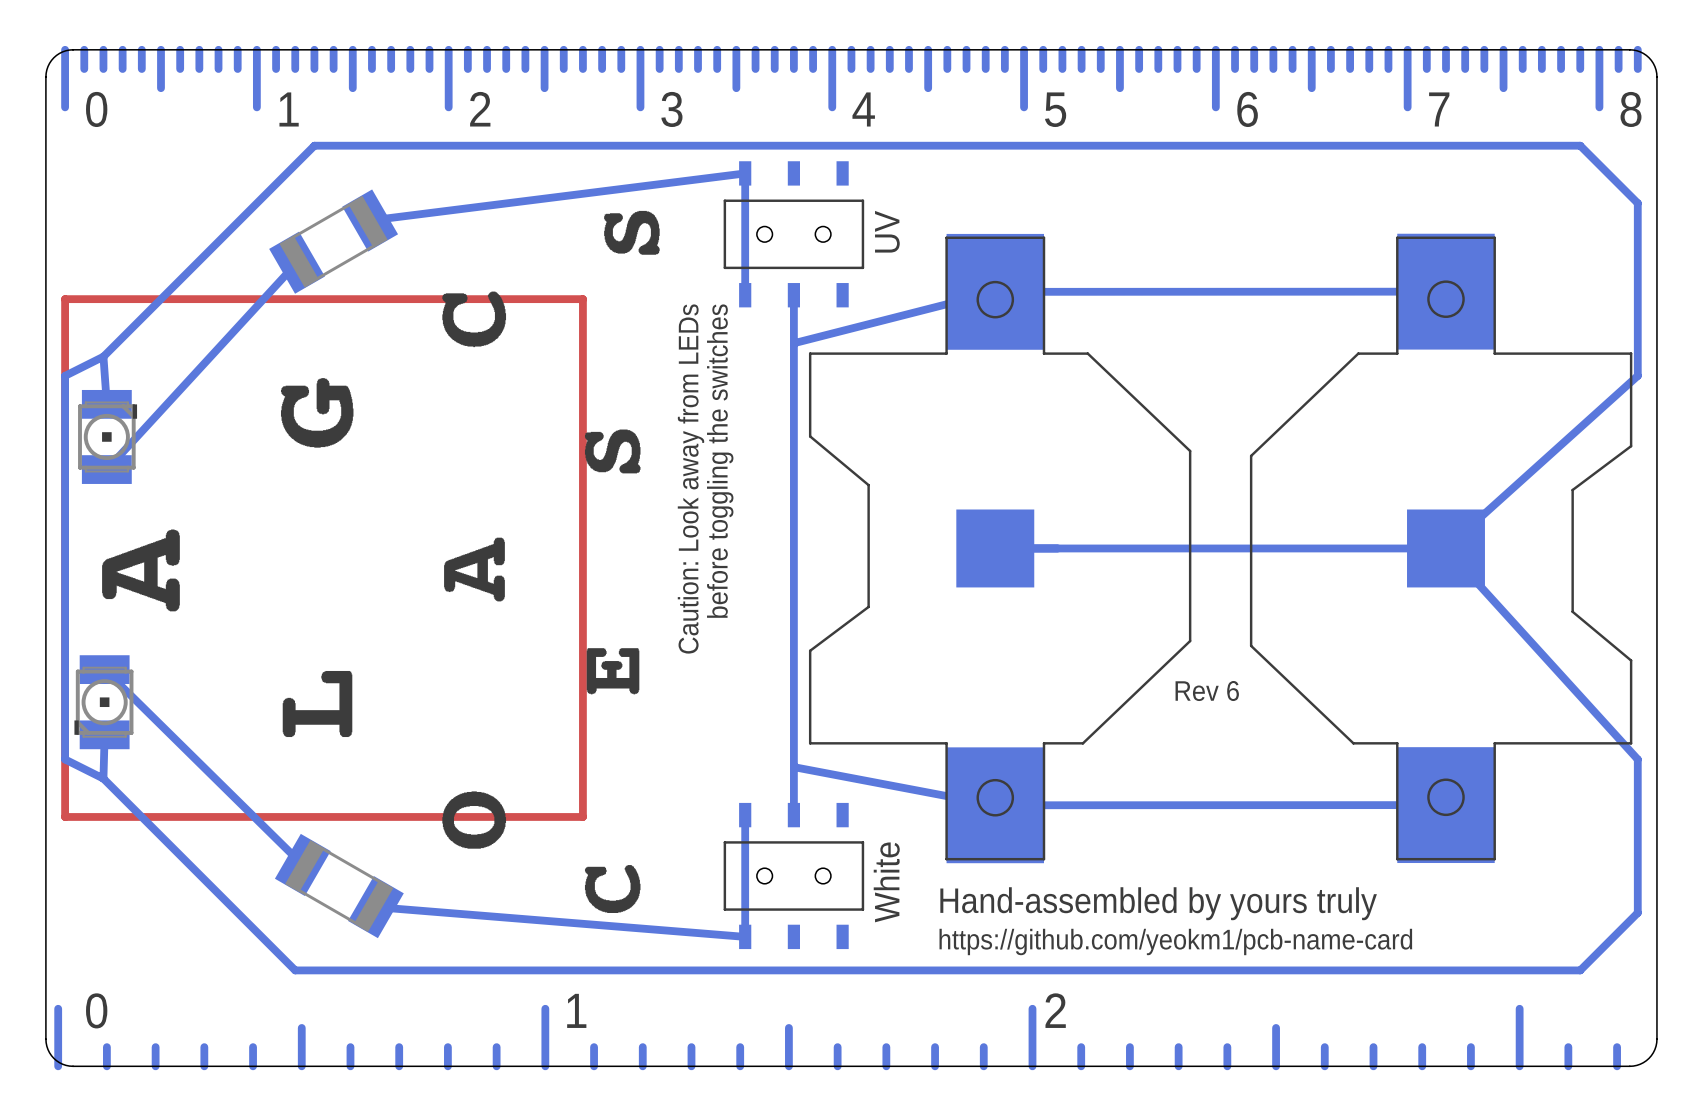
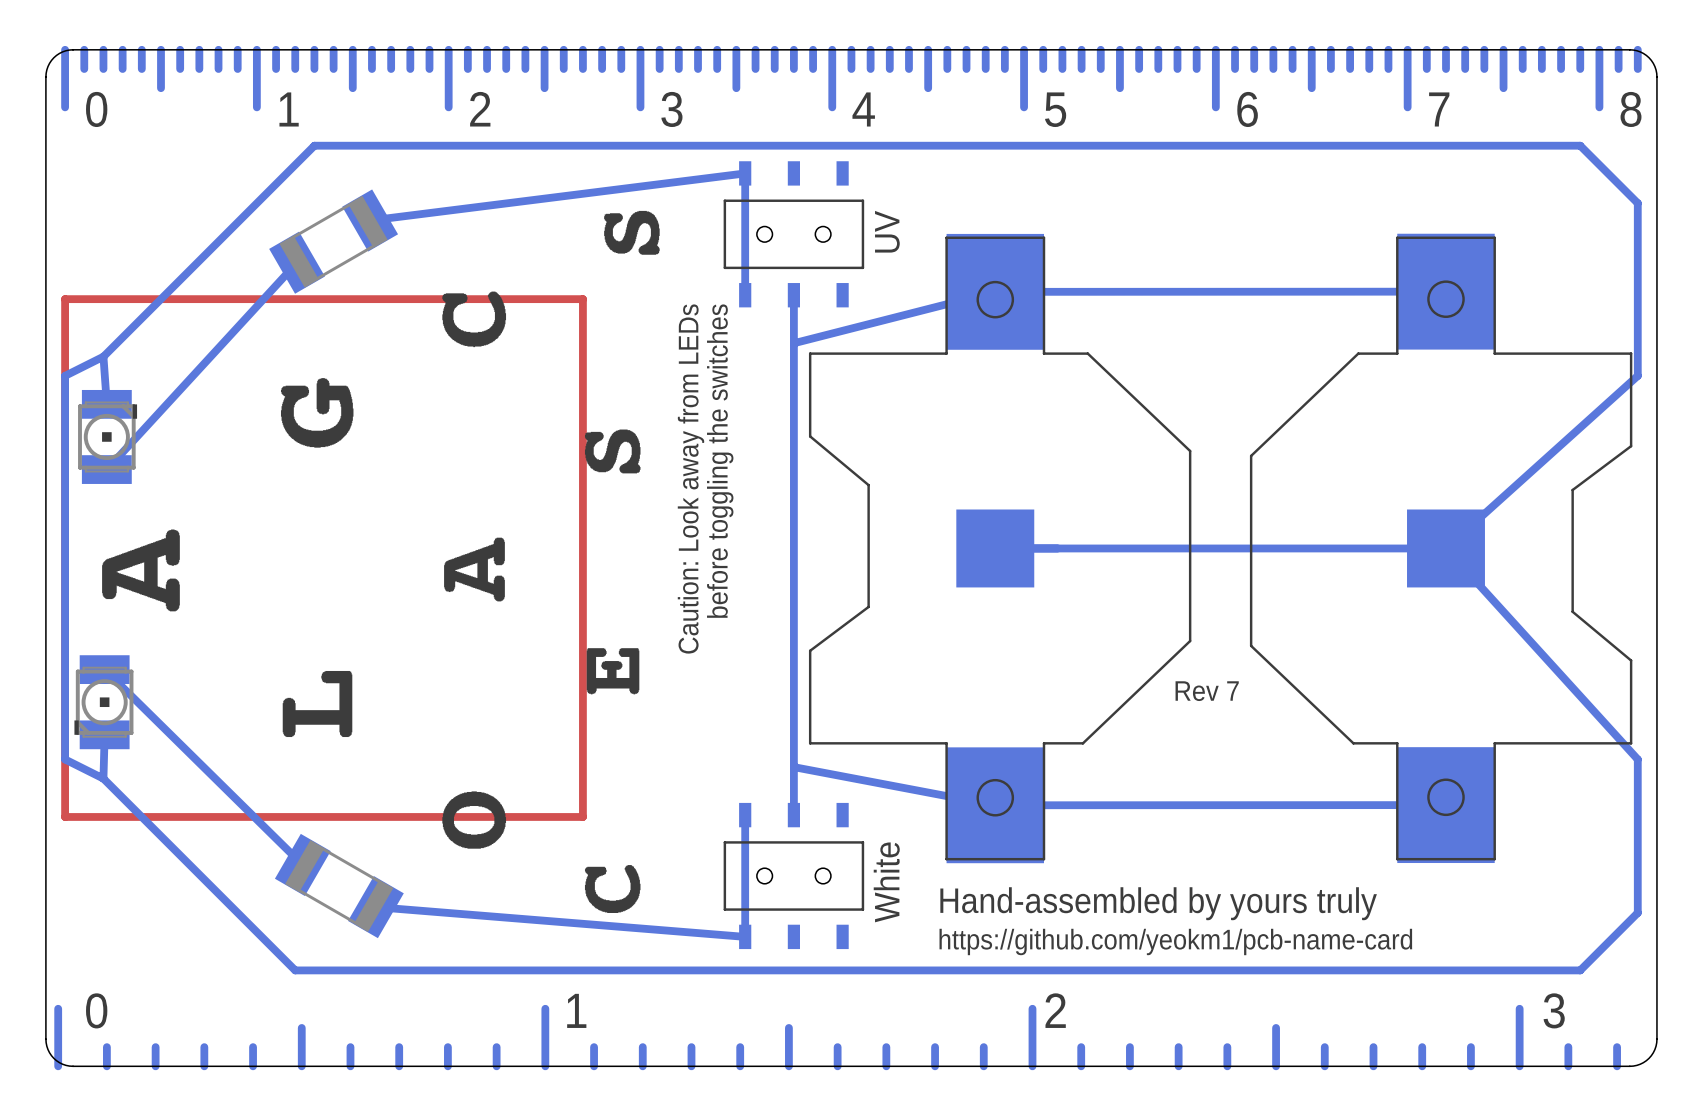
text: Rev 6 (1207, 691) -> Rev 7 (1207, 691)
text: none -> 3 (1554, 1010)

